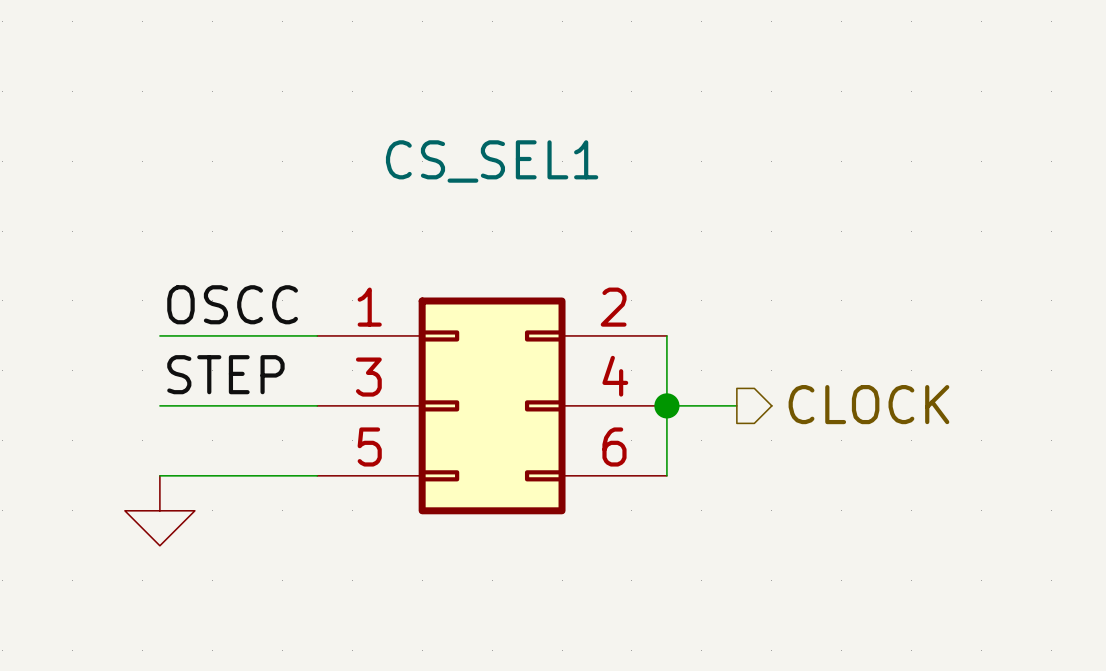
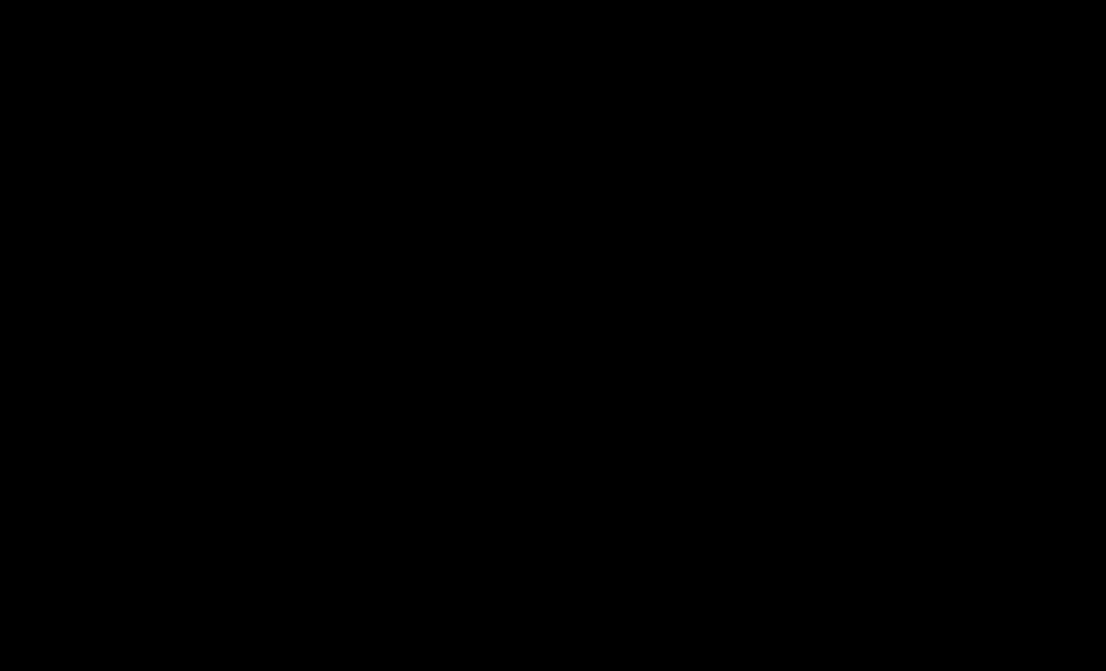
label: OSCC (232, 304) -> none
wire: (159, 335) (317, 335) -> none
wire: (666, 335) (666, 475) -> none
label: STEP (225, 374) -> none
hierarchical label: CLOCK (868, 404) -> none
wire: (159, 405) (317, 405) -> none
CS_SEL1: (492, 405) -> none
wire: (666, 405) (736, 405) -> none
junction: (666, 405) -> none
wire: (159, 475) (317, 475) -> none
power symbol: (159, 510) -> none

